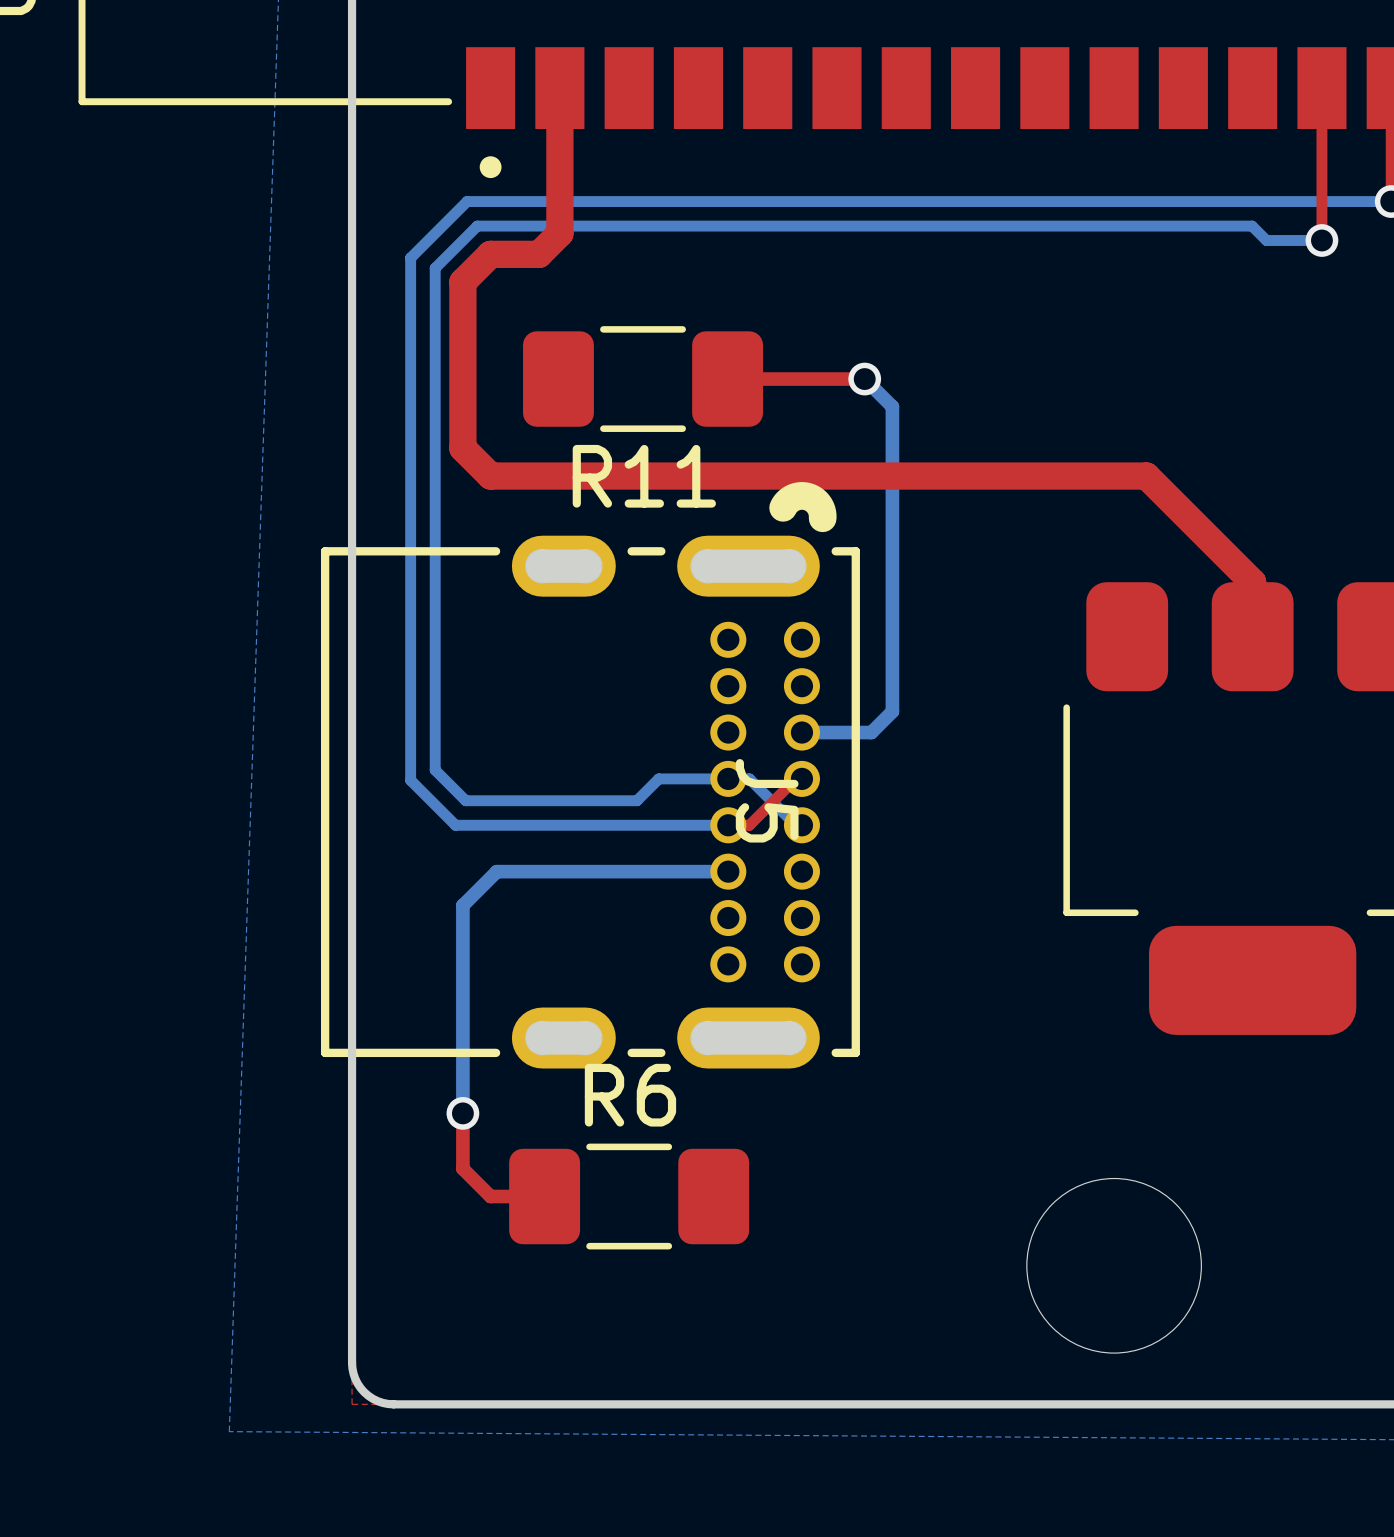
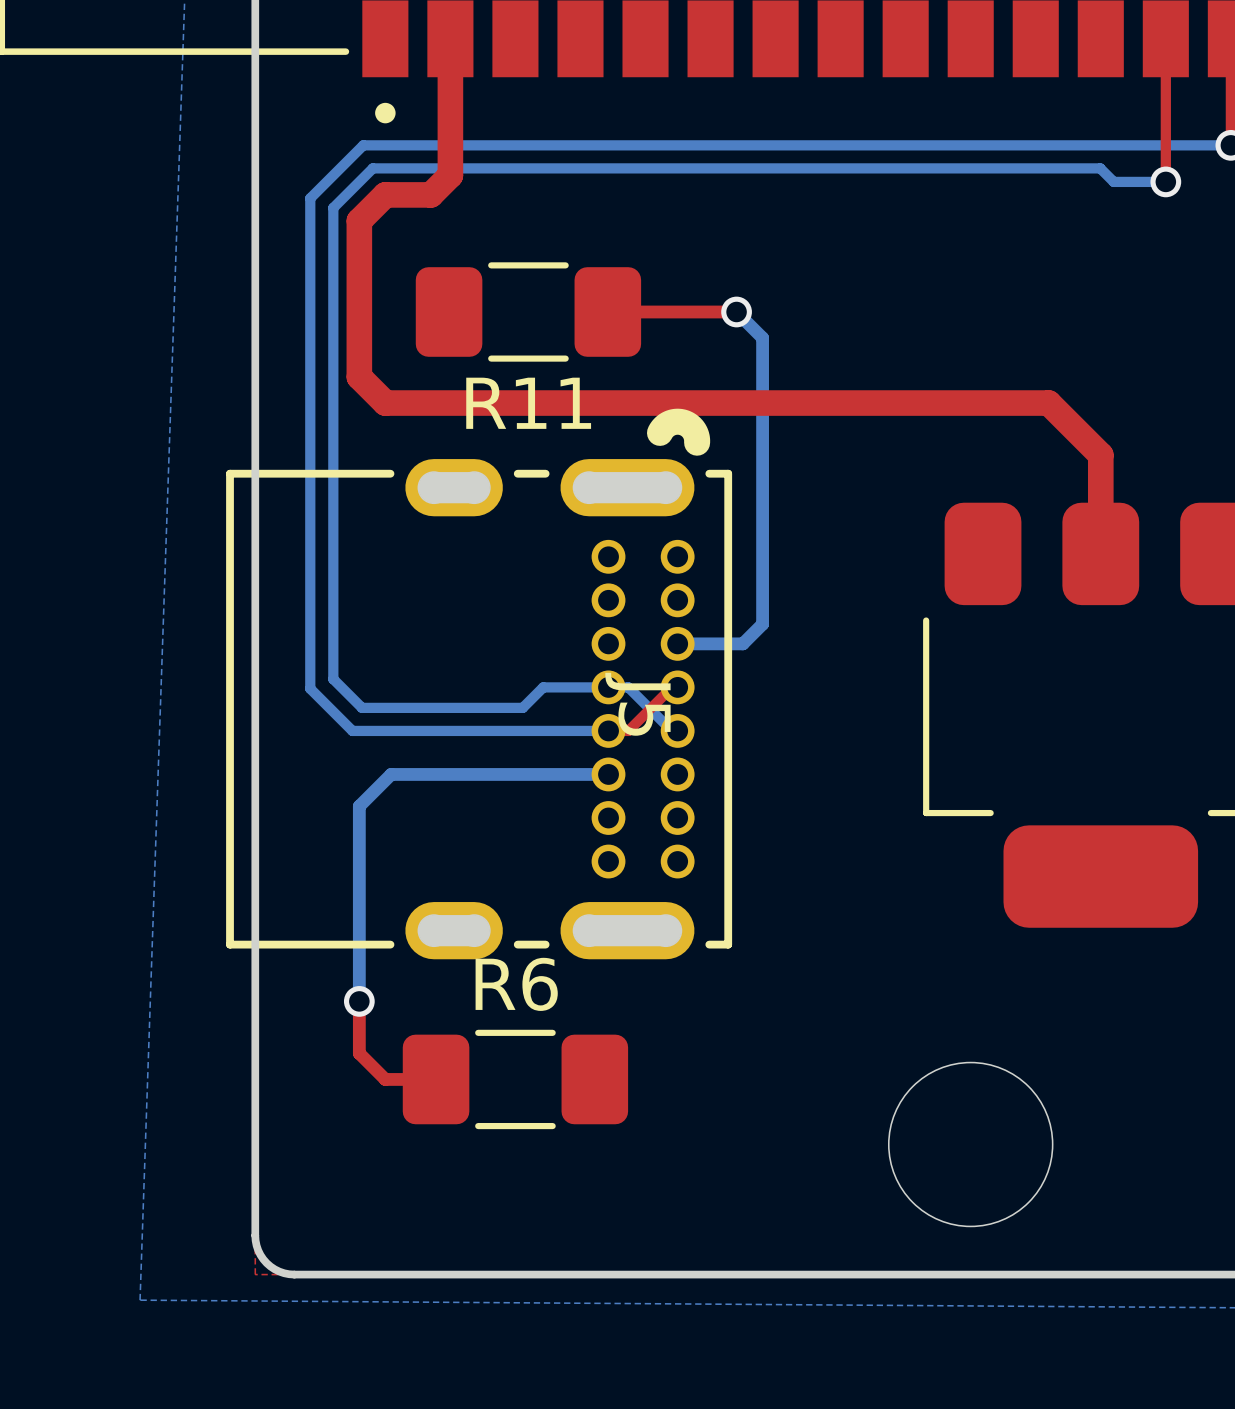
top track: (1146, 476) (1252, 582) -> (1001, 403) (1048, 403) (1100, 455) (1100, 502)

